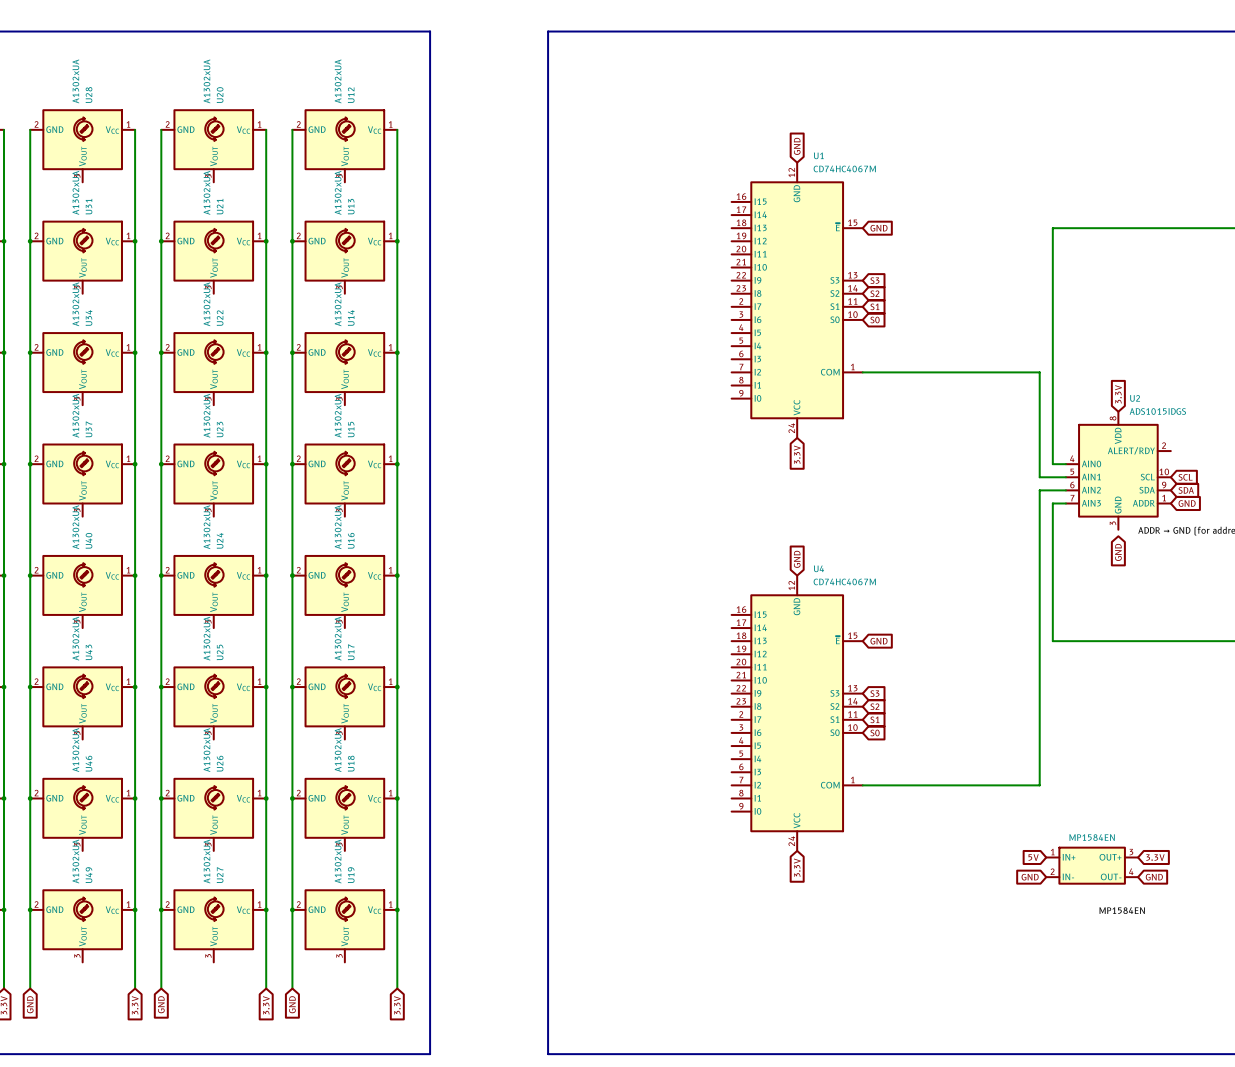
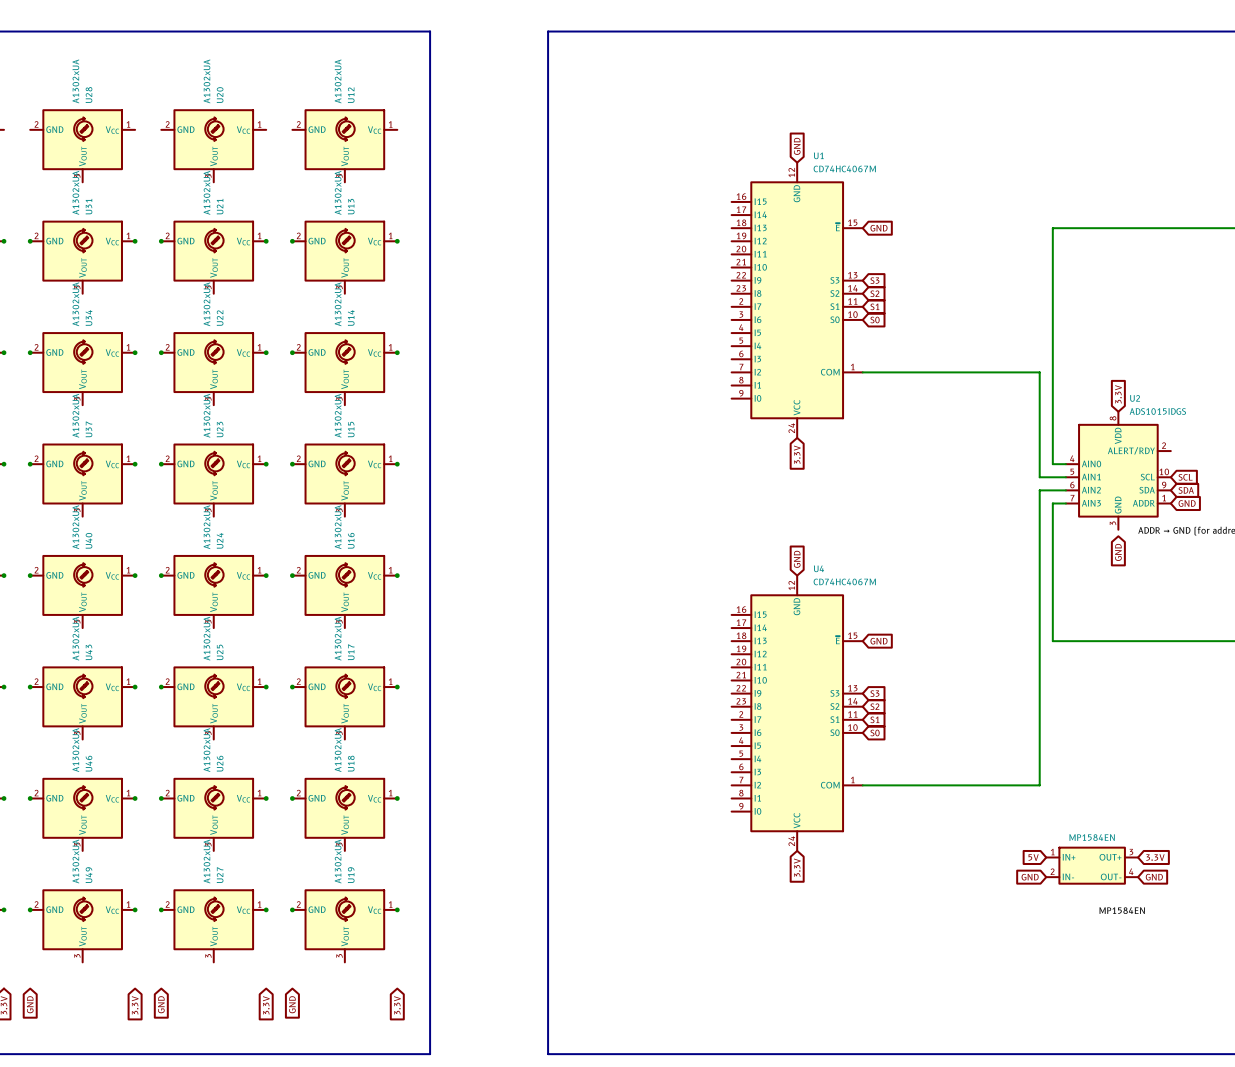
wire: (3, 129) (3, 988) -> none
wire: (30, 129) (30, 988) -> none
wire: (135, 129) (135, 988) -> none
wire: (161, 129) (161, 988) -> none
wire: (266, 129) (266, 988) -> none
wire: (292, 129) (292, 988) -> none
wire: (397, 129) (397, 988) -> none

